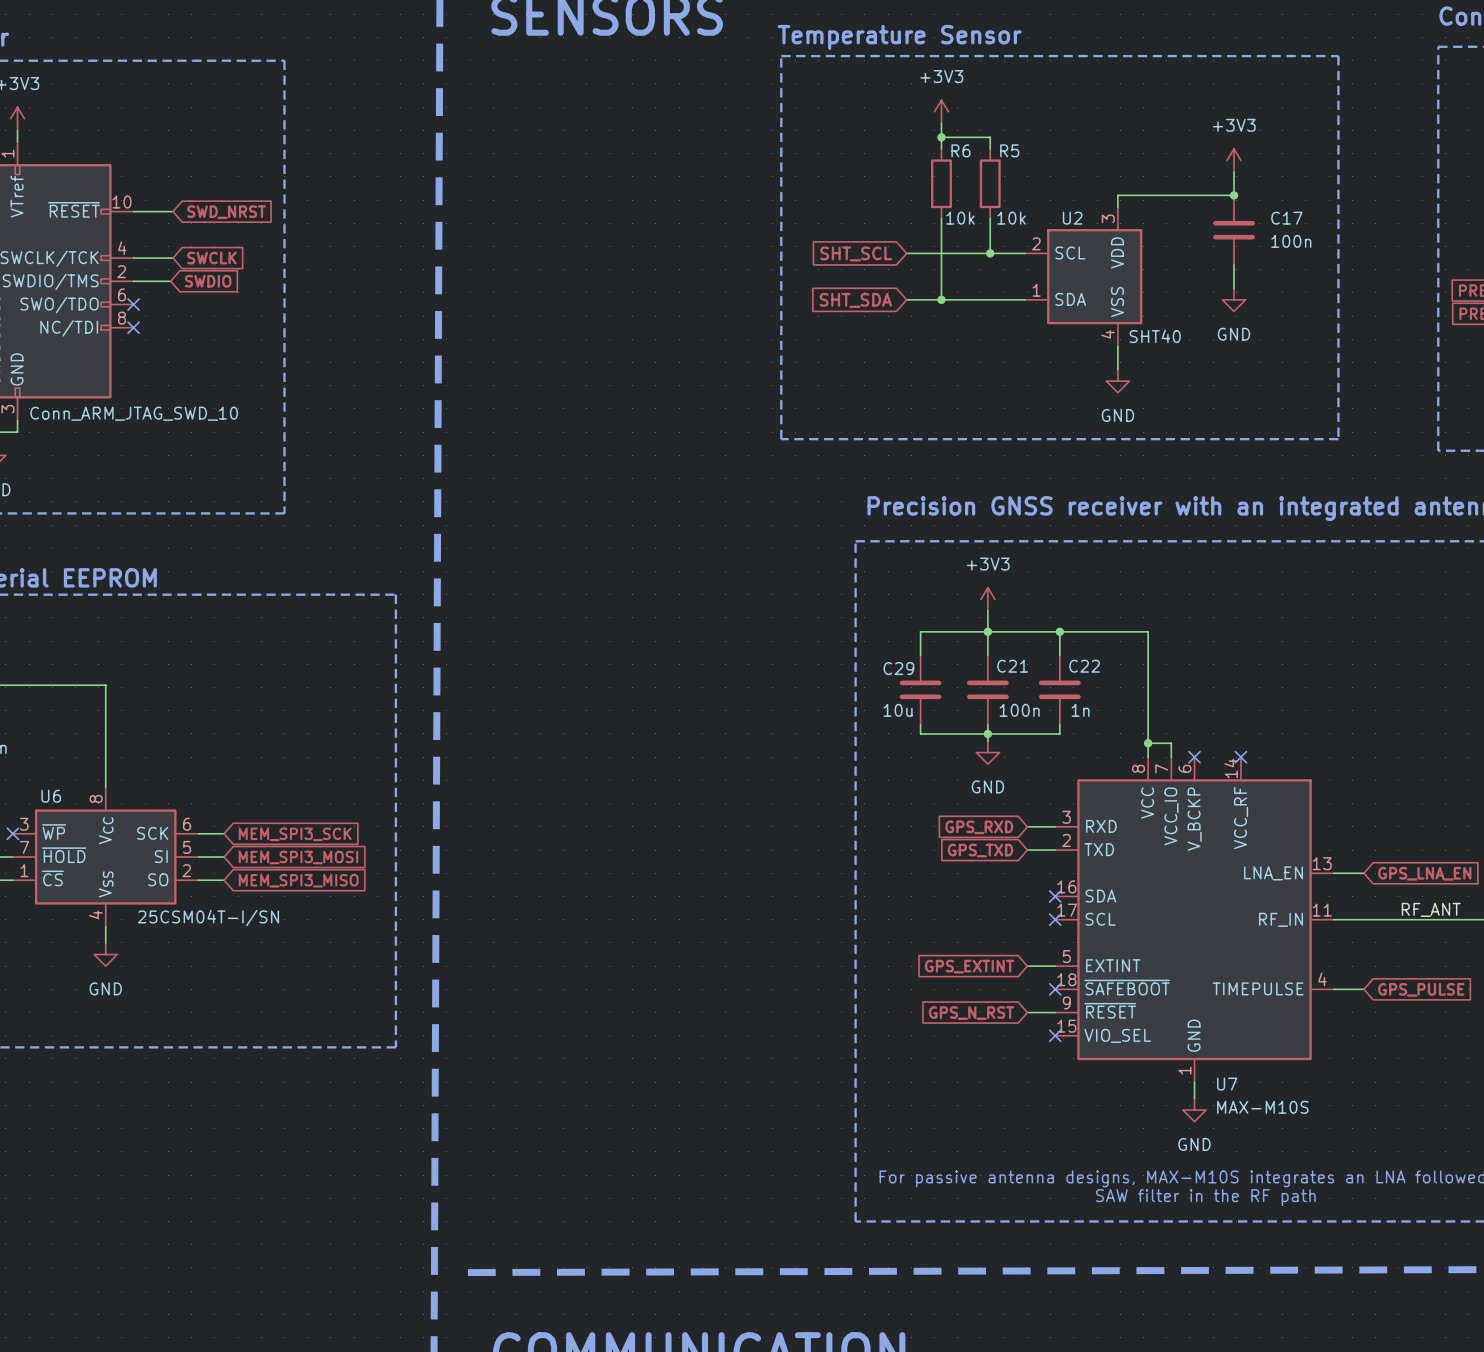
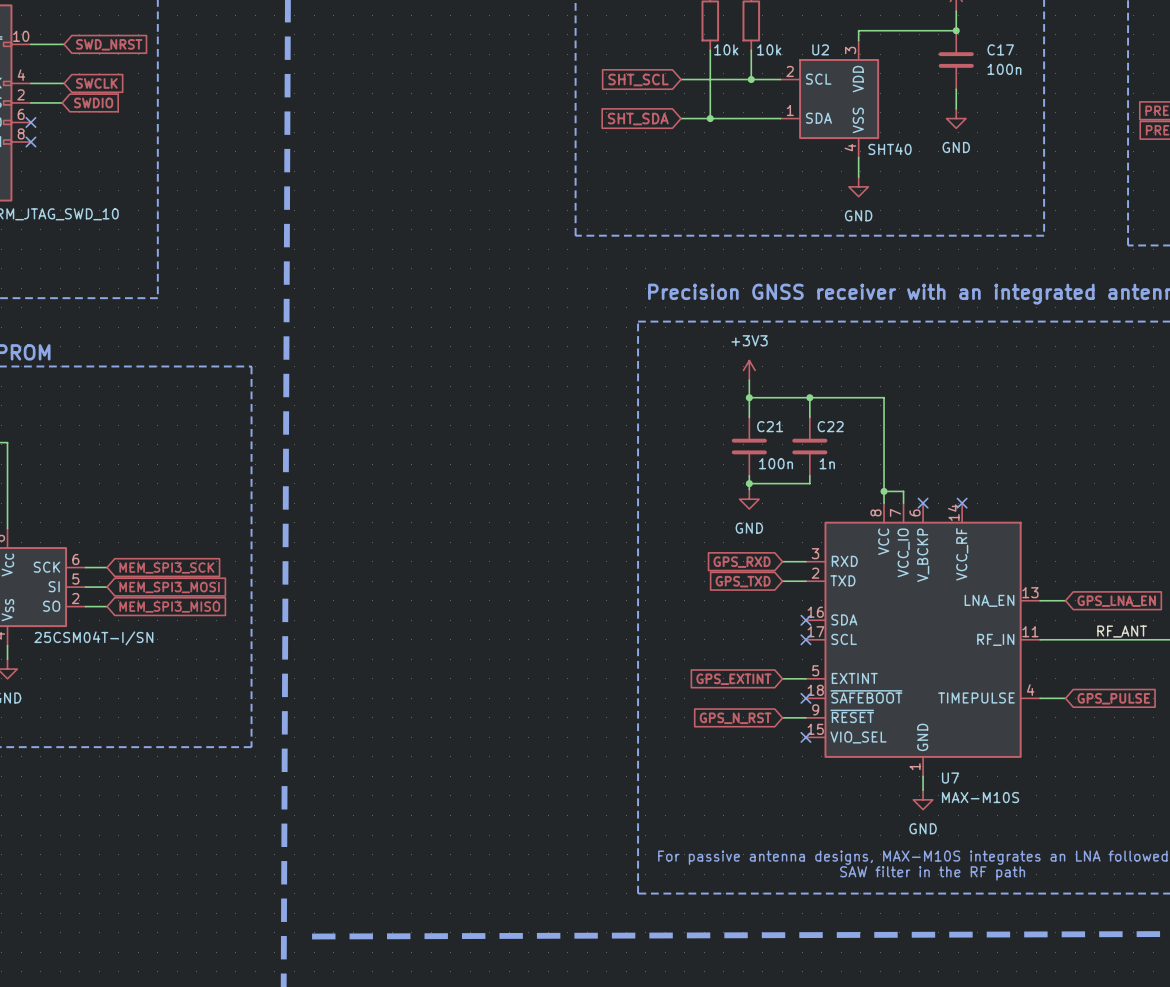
wire: (987, 631) (920, 631) (920, 655) -> none
C29: 10u (920, 689) -> none
wire: (920, 724) (920, 733) (987, 733) -> none

